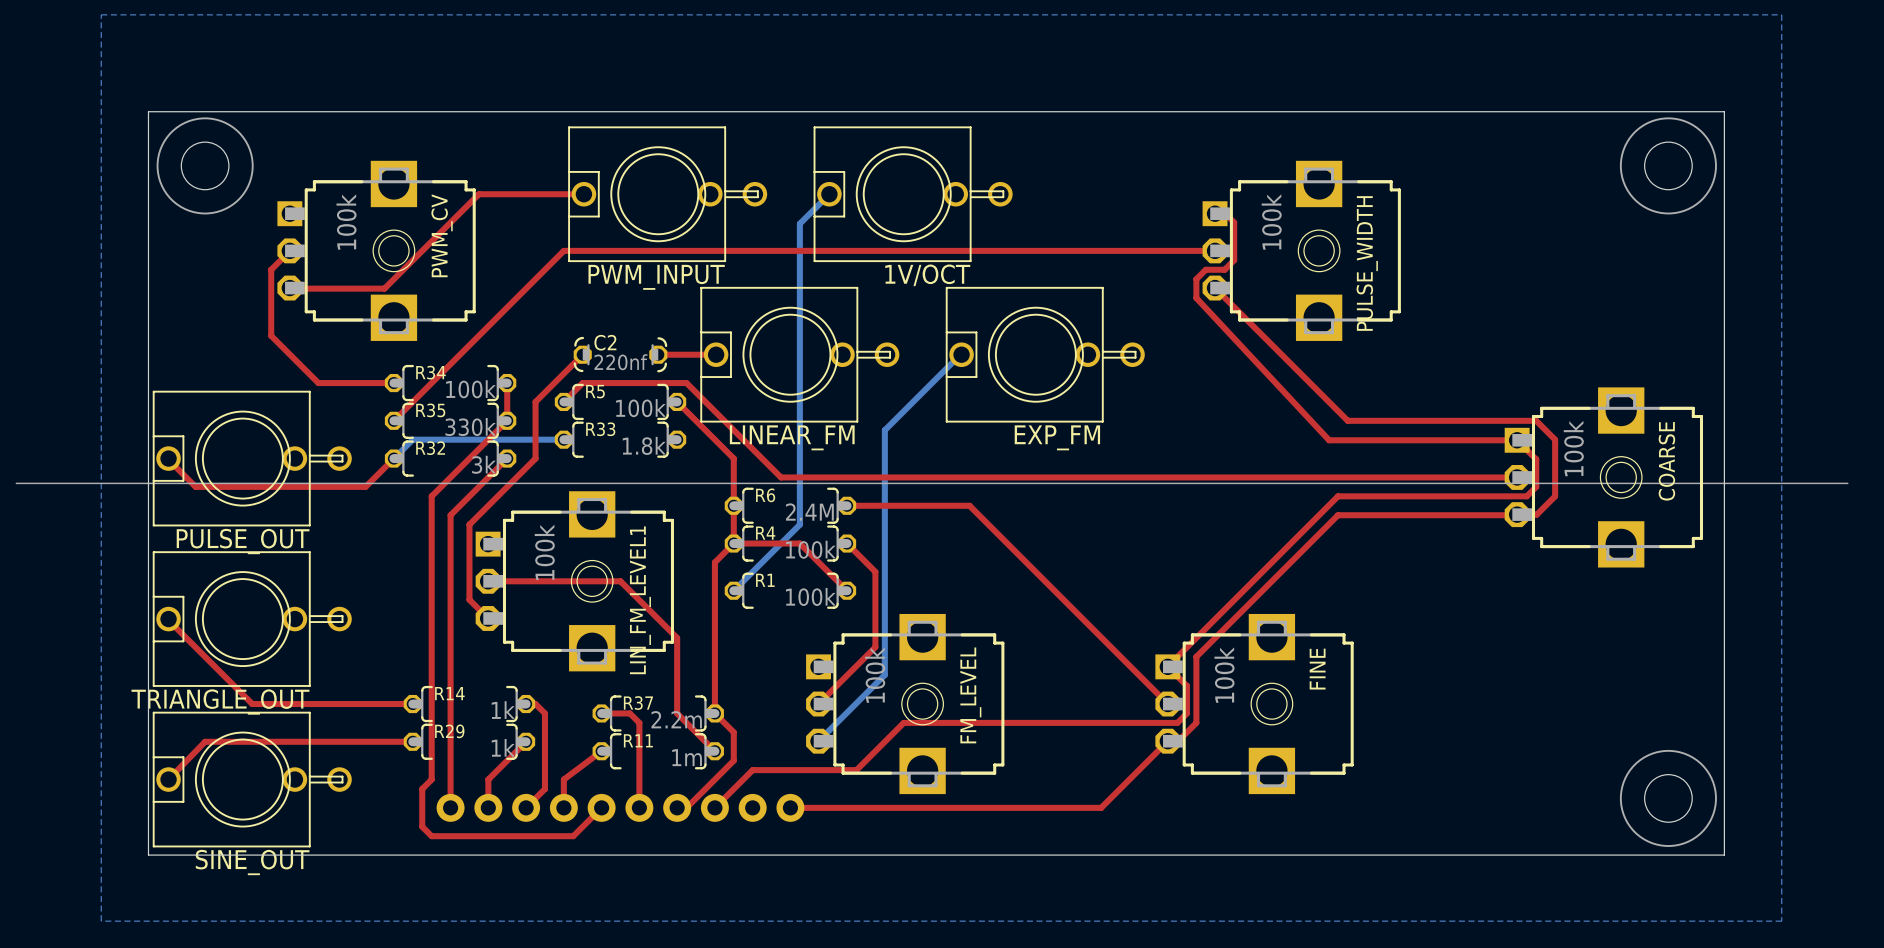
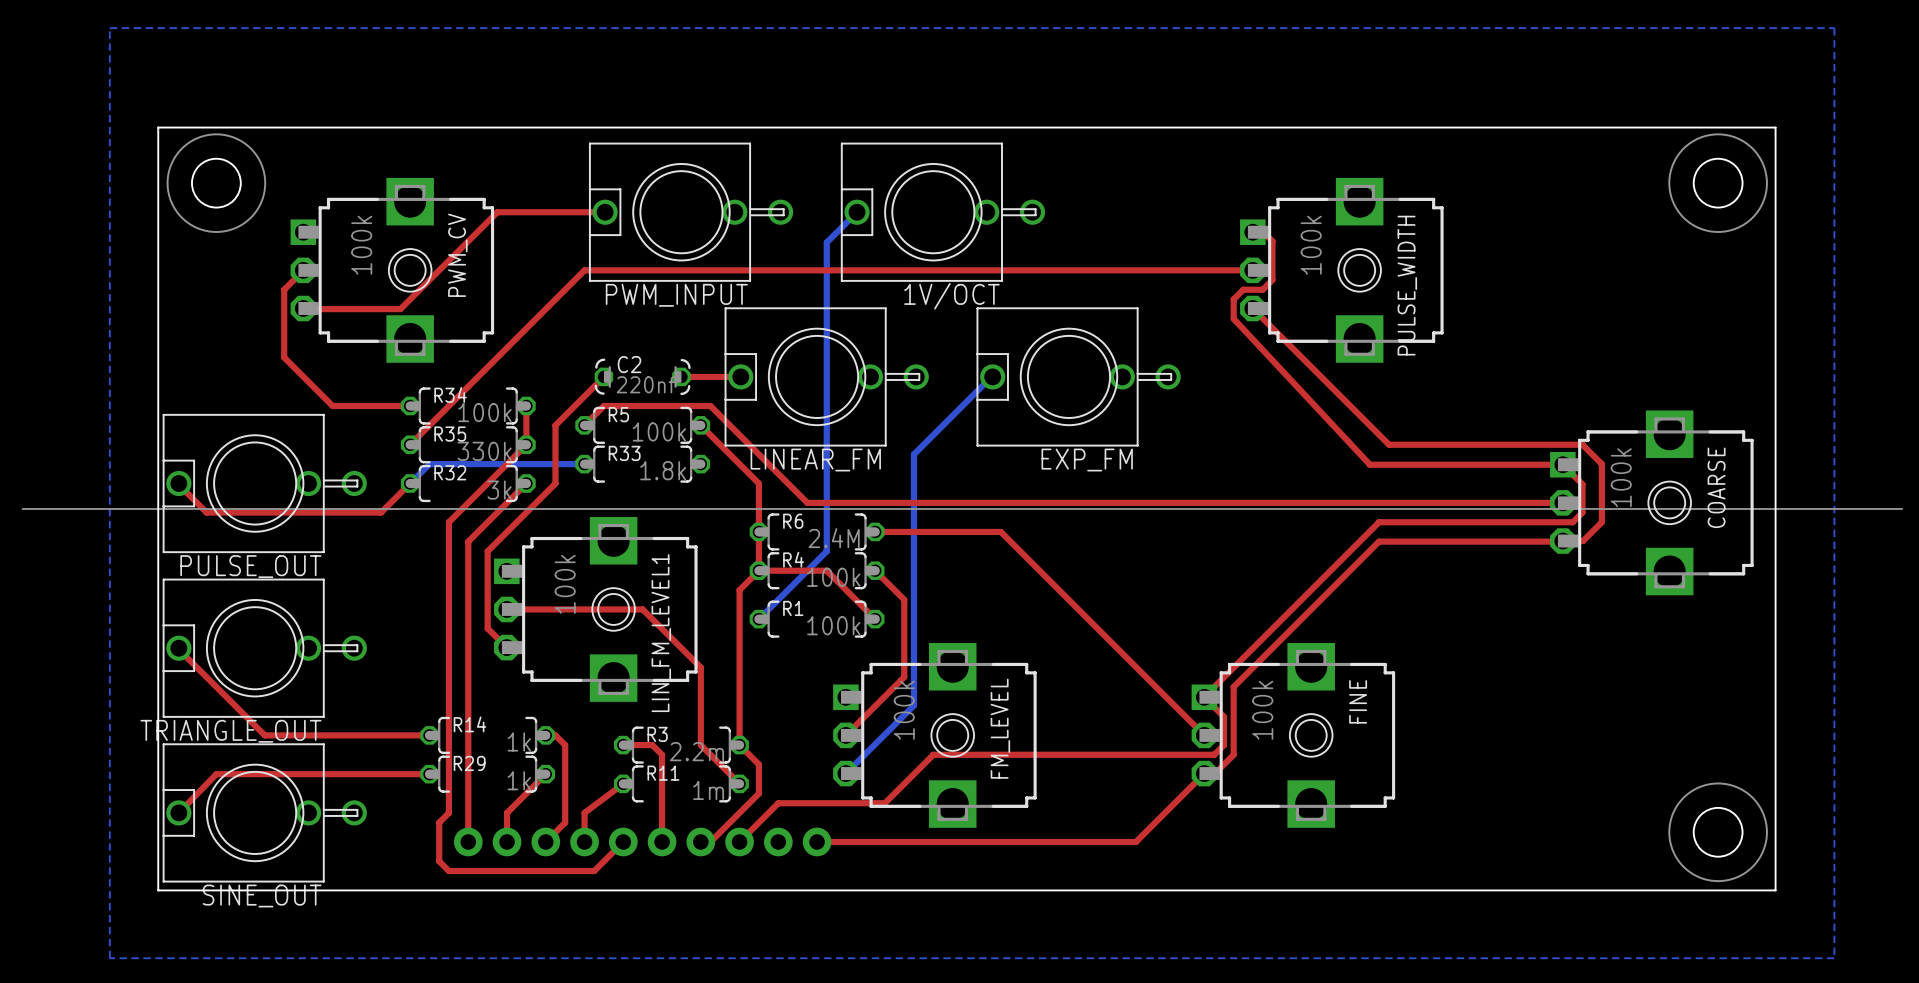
R37 name: R37 (638, 703) -> R3 (657, 734)

